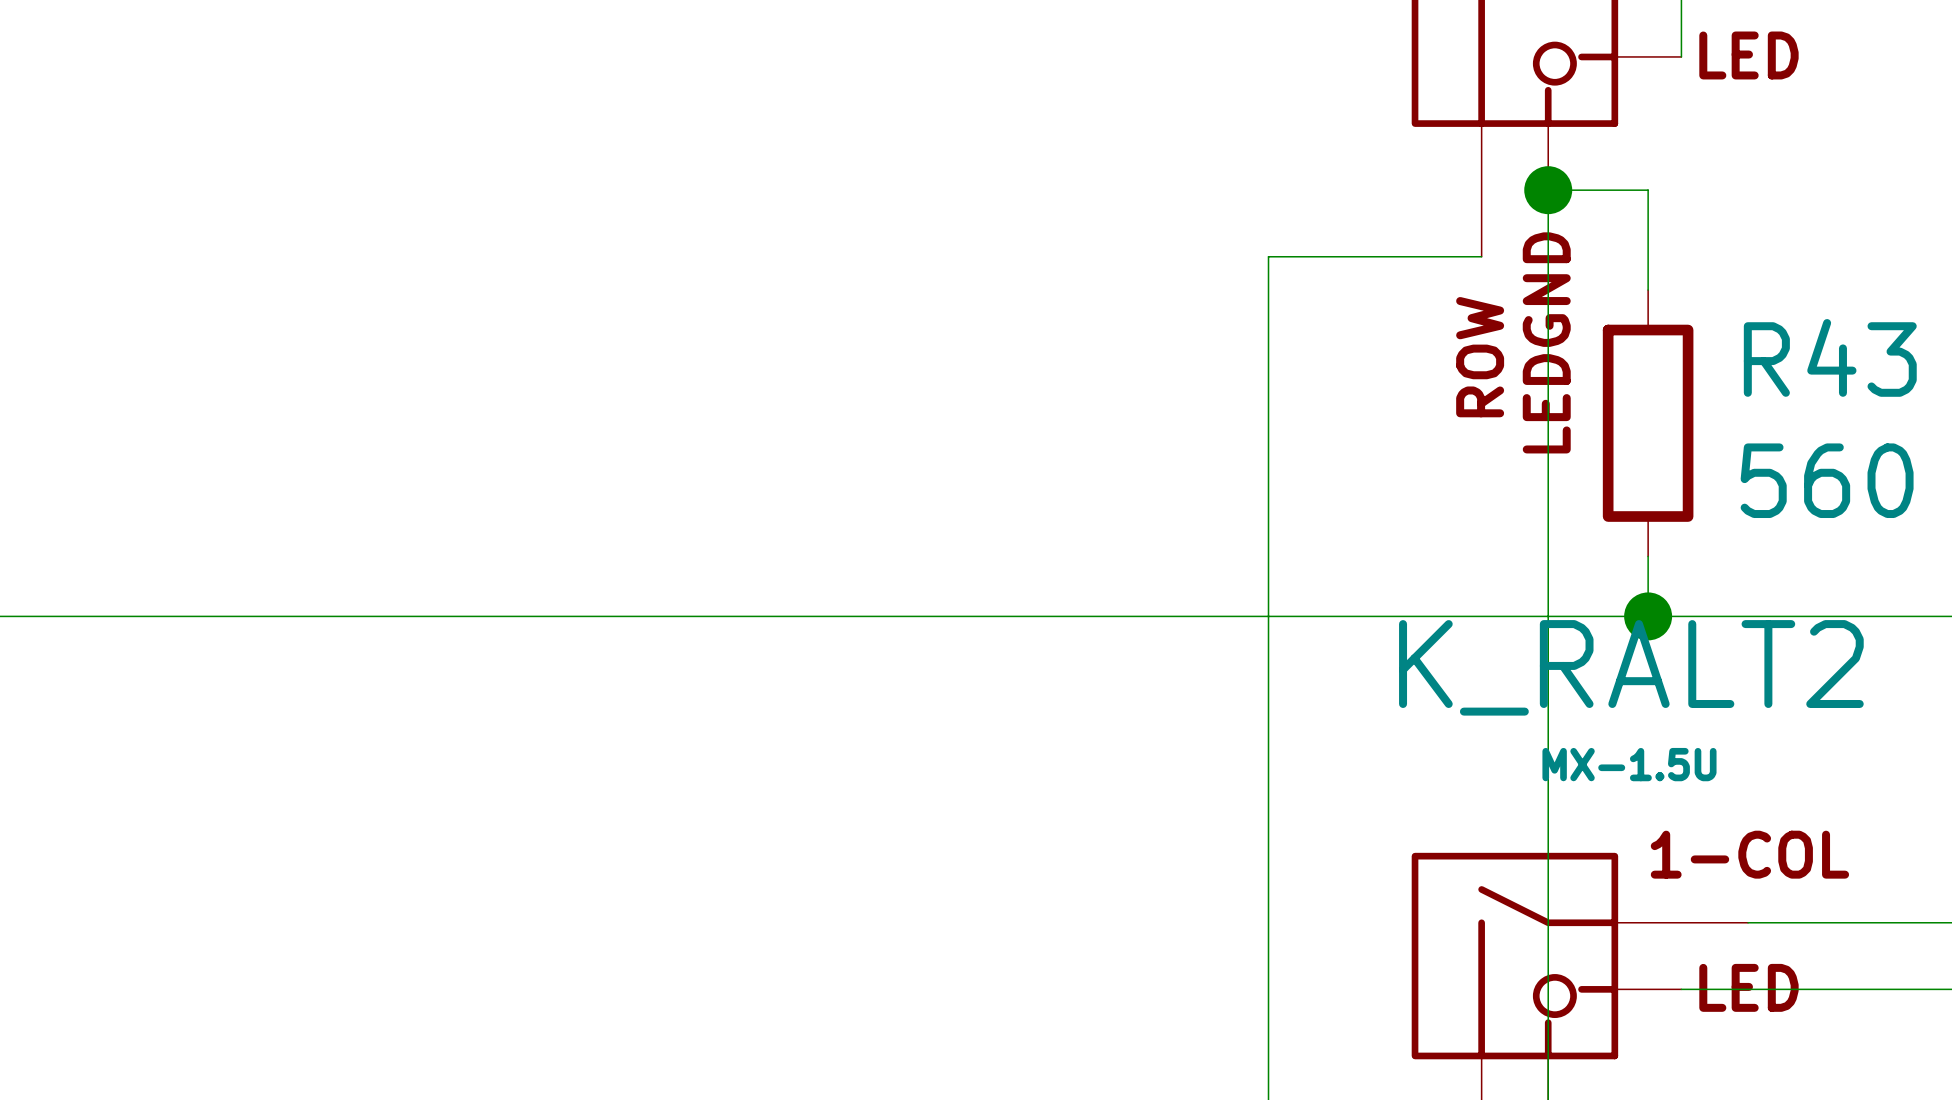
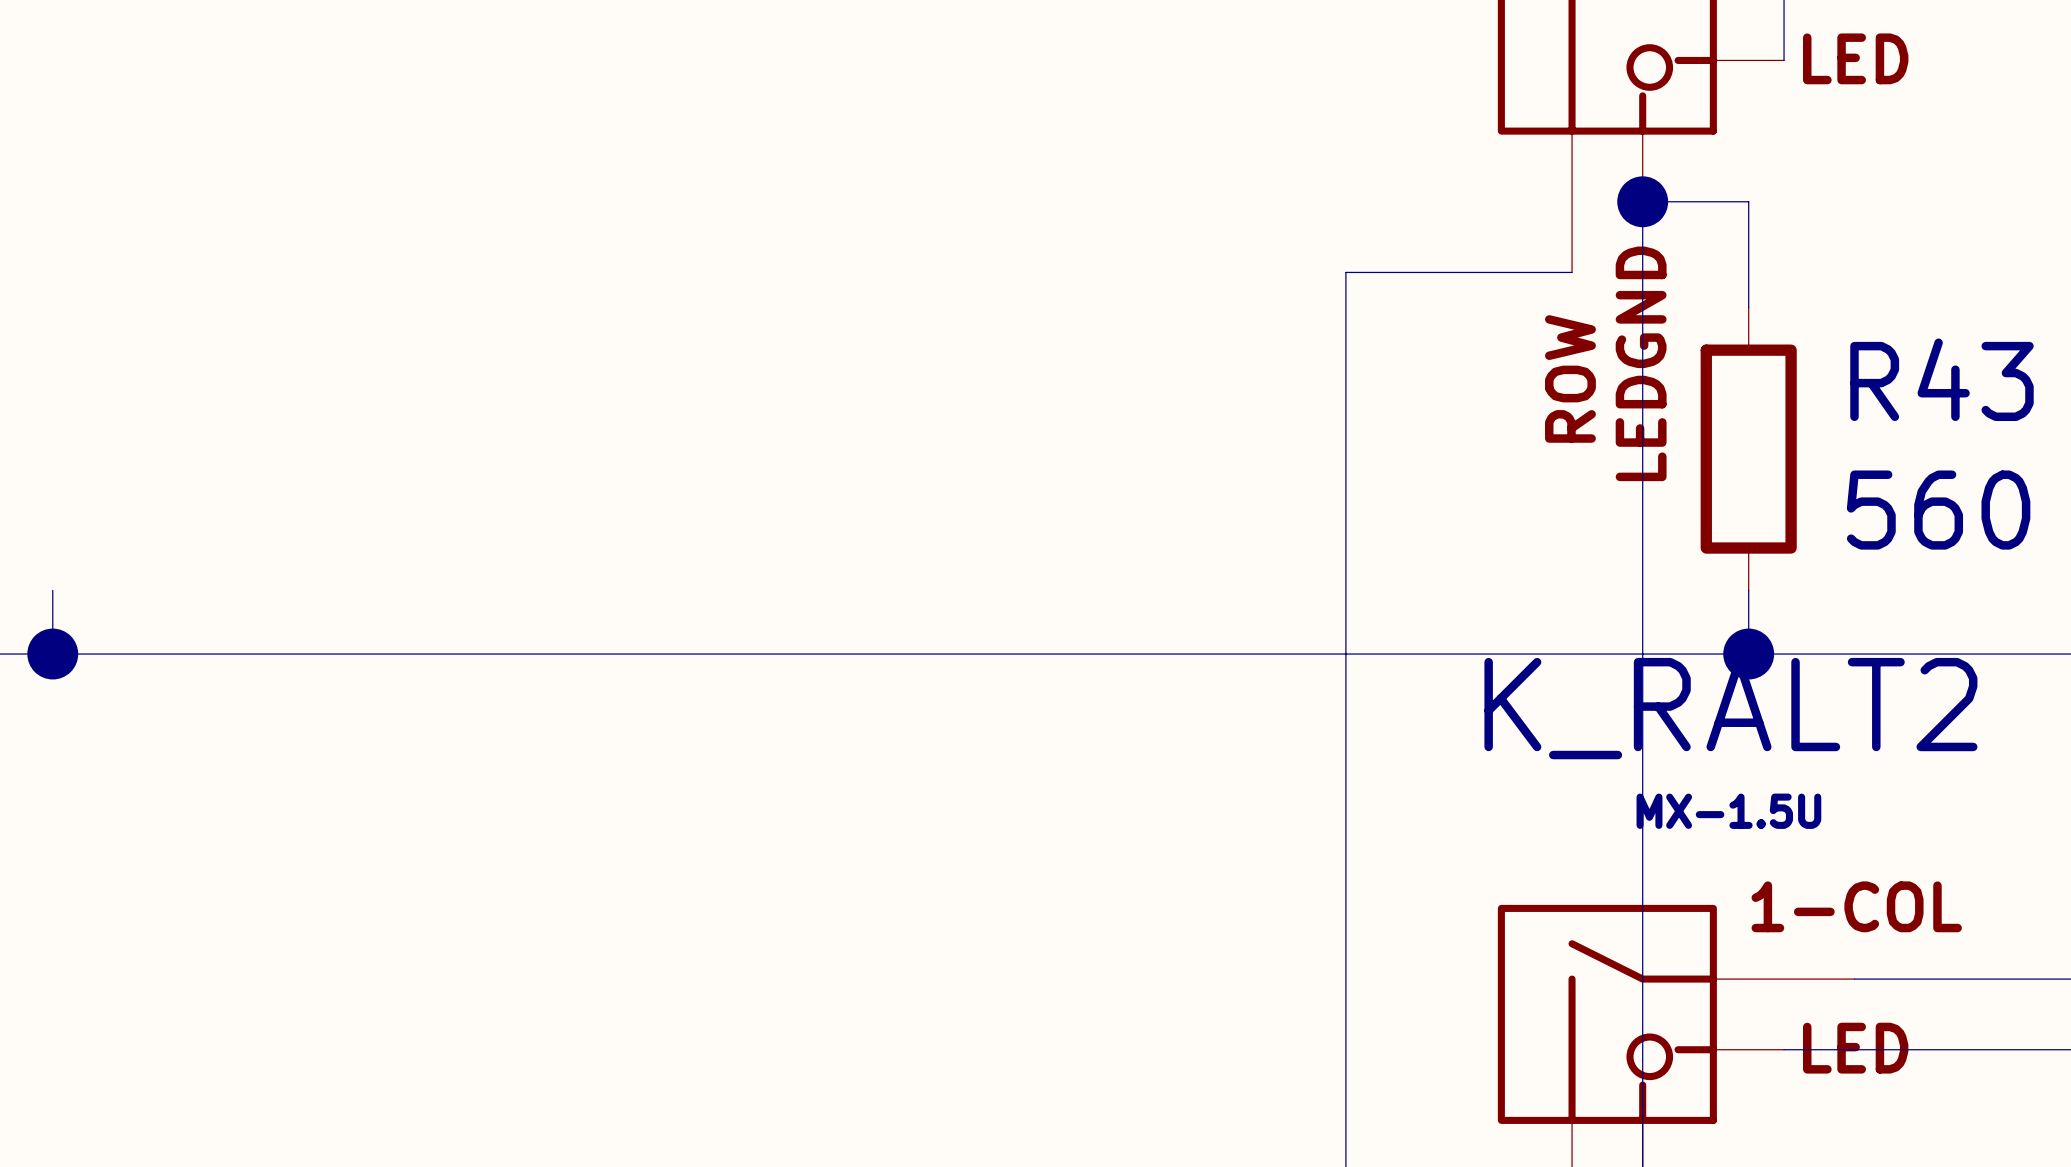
wire: none -> (52, 590) (52, 654)
junction: none -> (52, 654)

